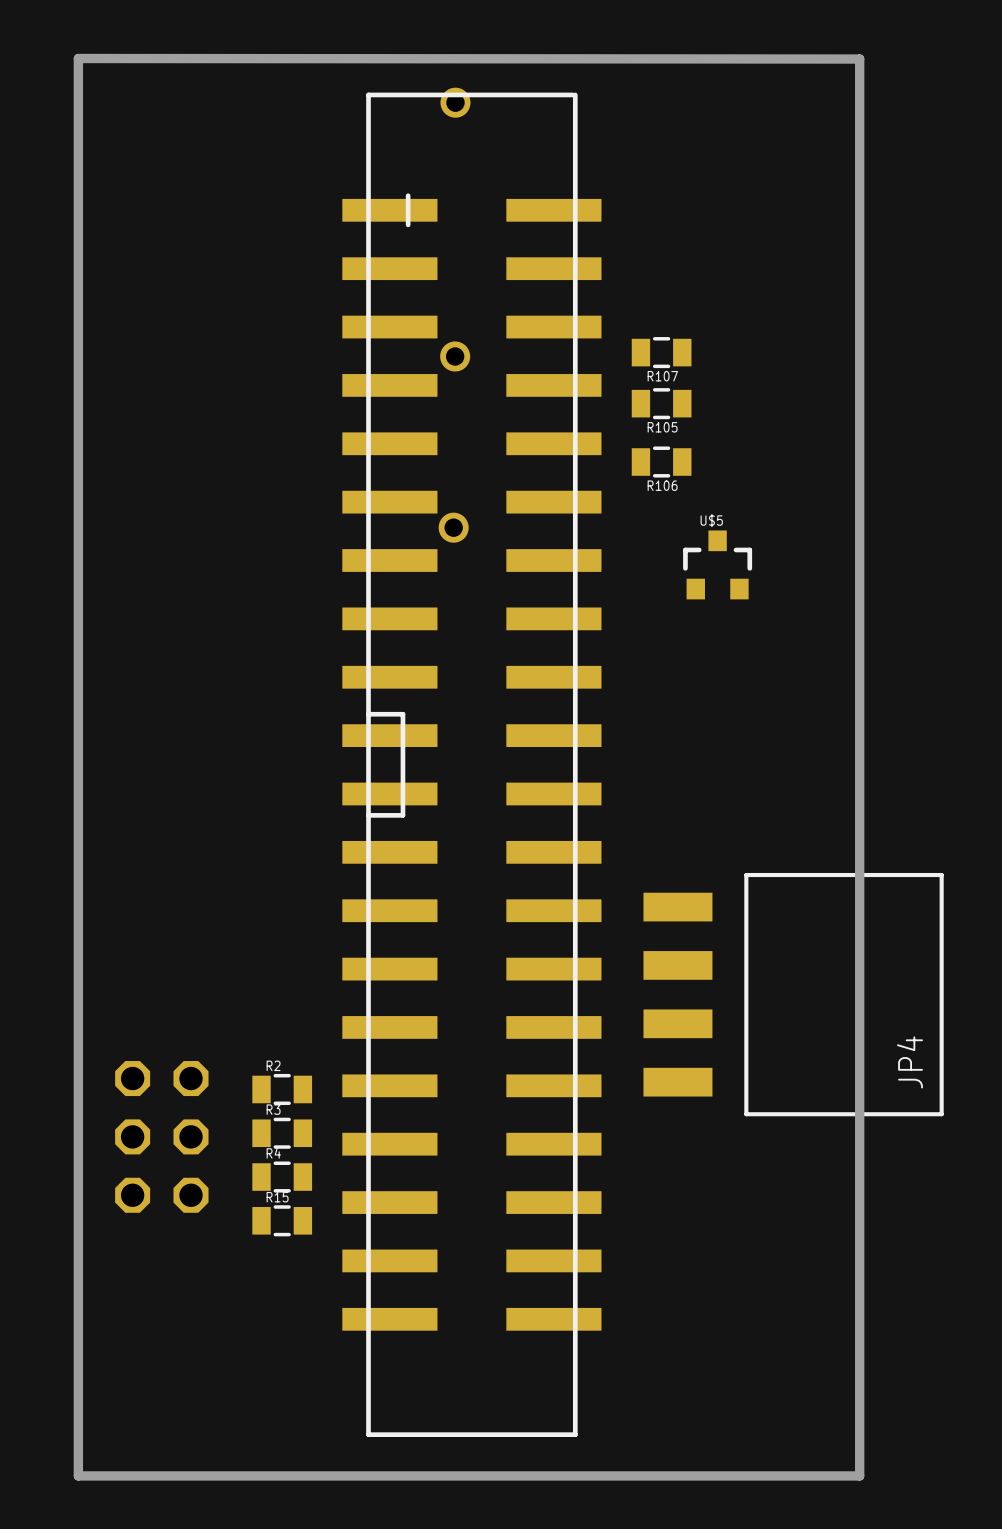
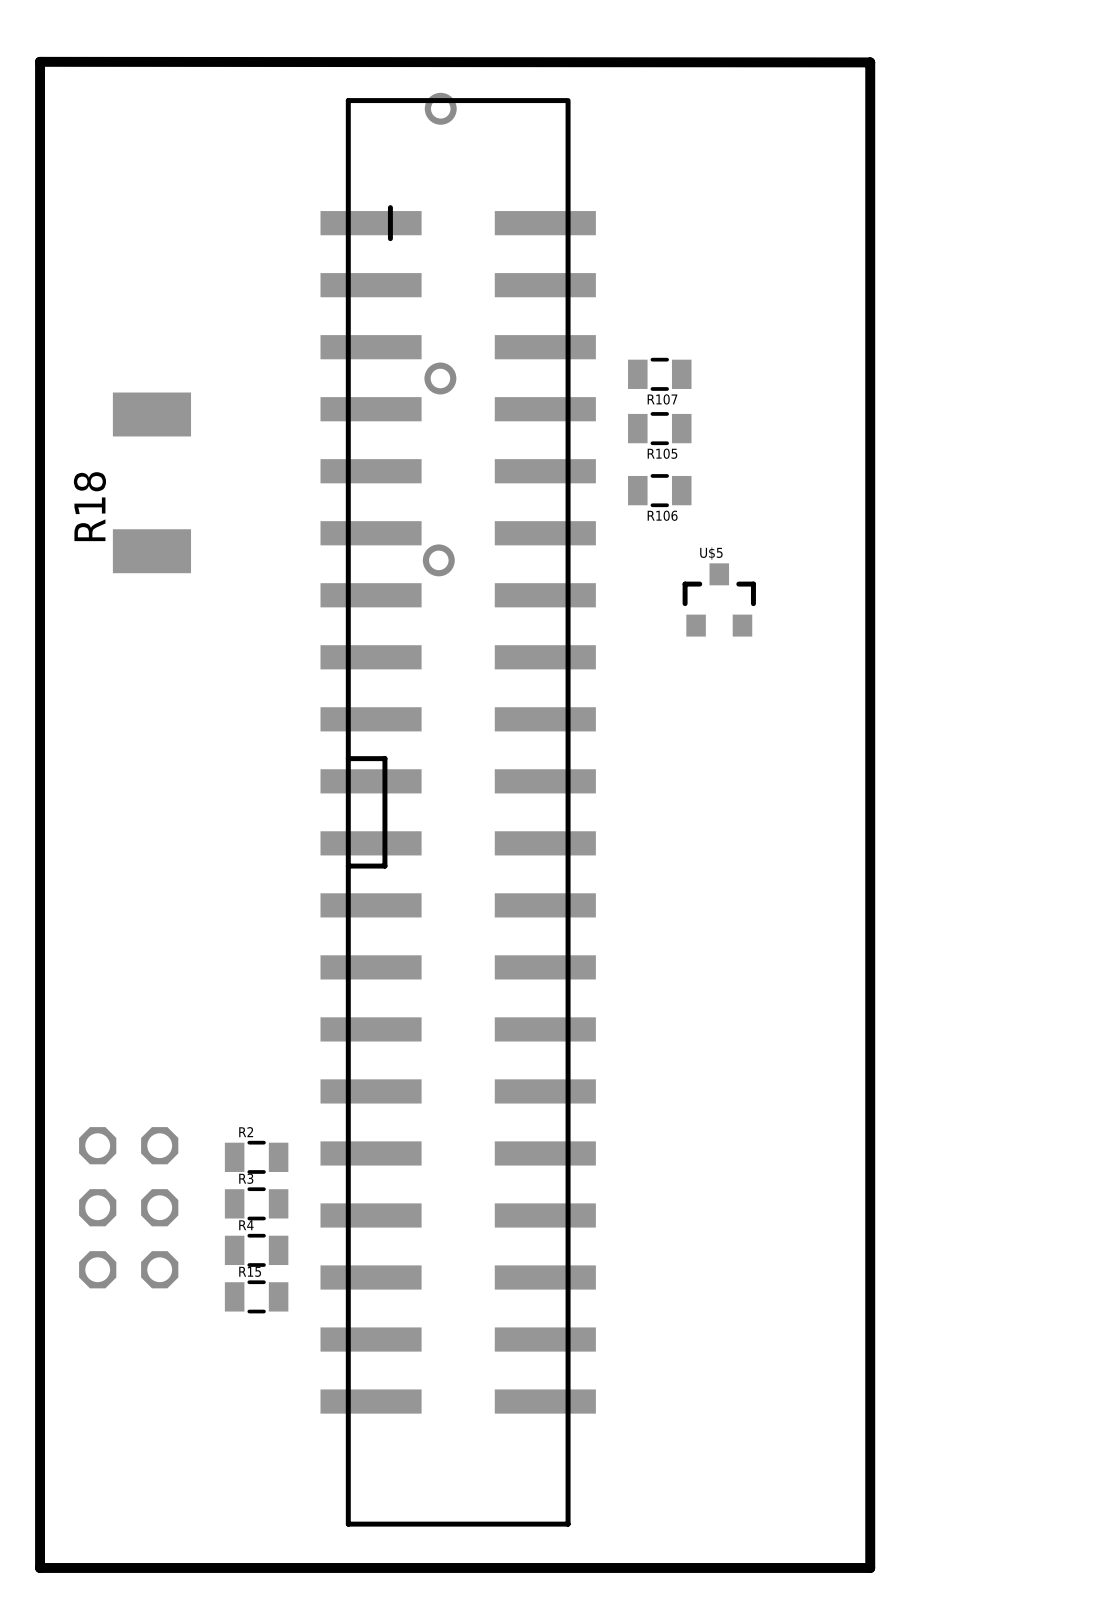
R18: none -> (151, 482)
JP4: (793, 994) -> none

